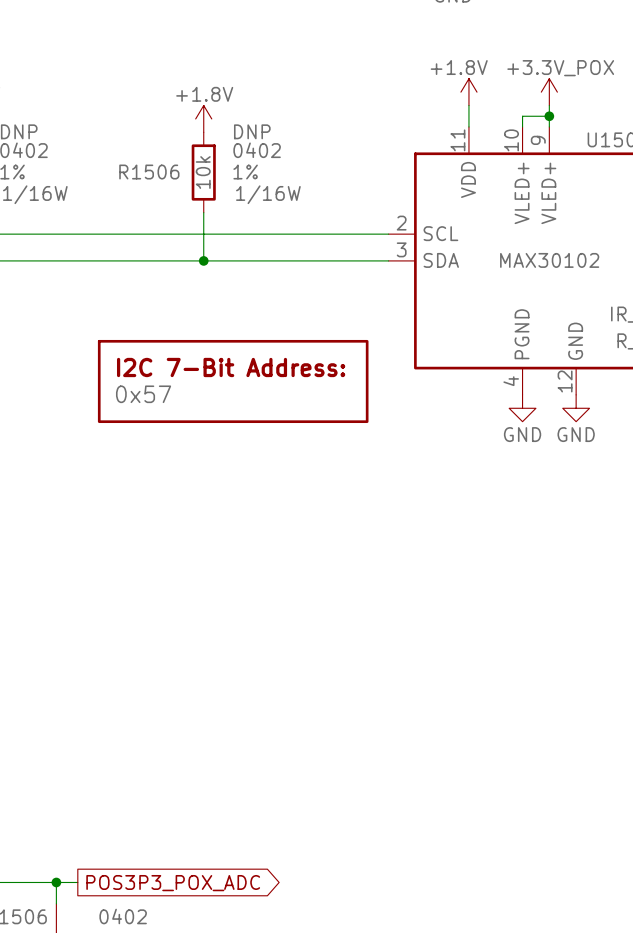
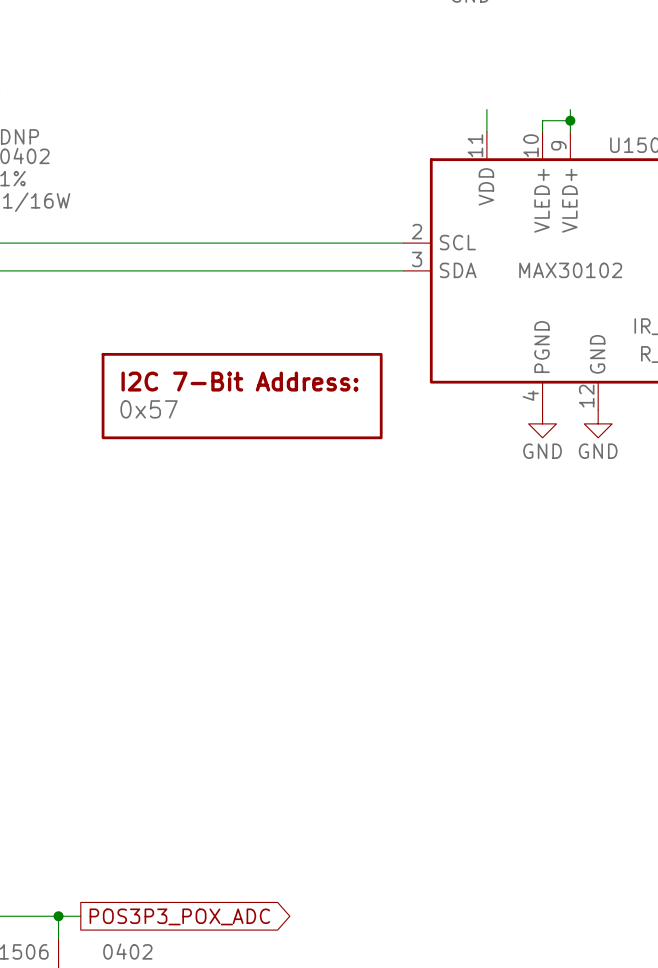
power symbol: +1.8V (468, 92) -> none
power symbol: +3.3V_POX (549, 92) -> none
power symbol: +1.8V (203, 118) -> none
R1506: 10k (203, 172) -> none
wire: (203, 212) (203, 260) -> none
junction: (203, 260) -> none

